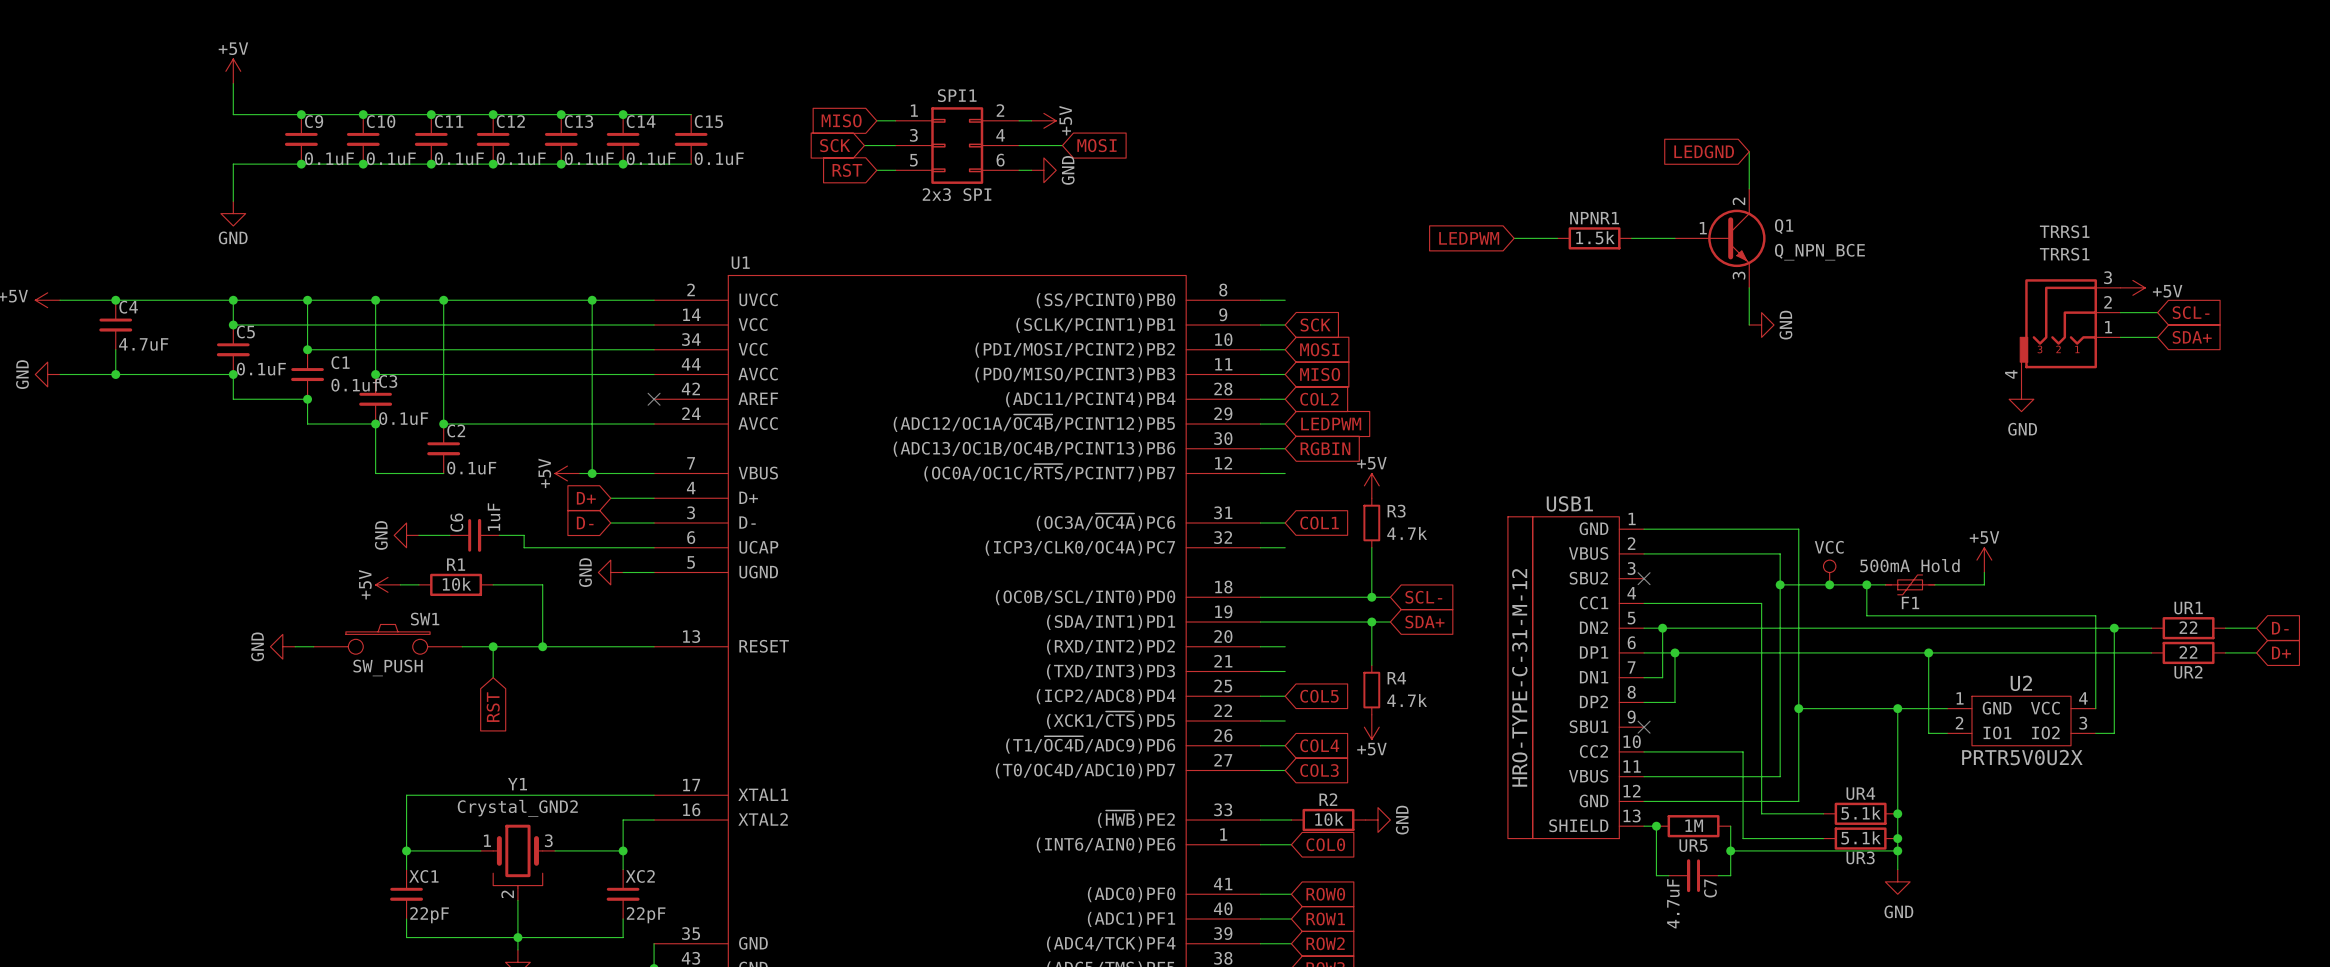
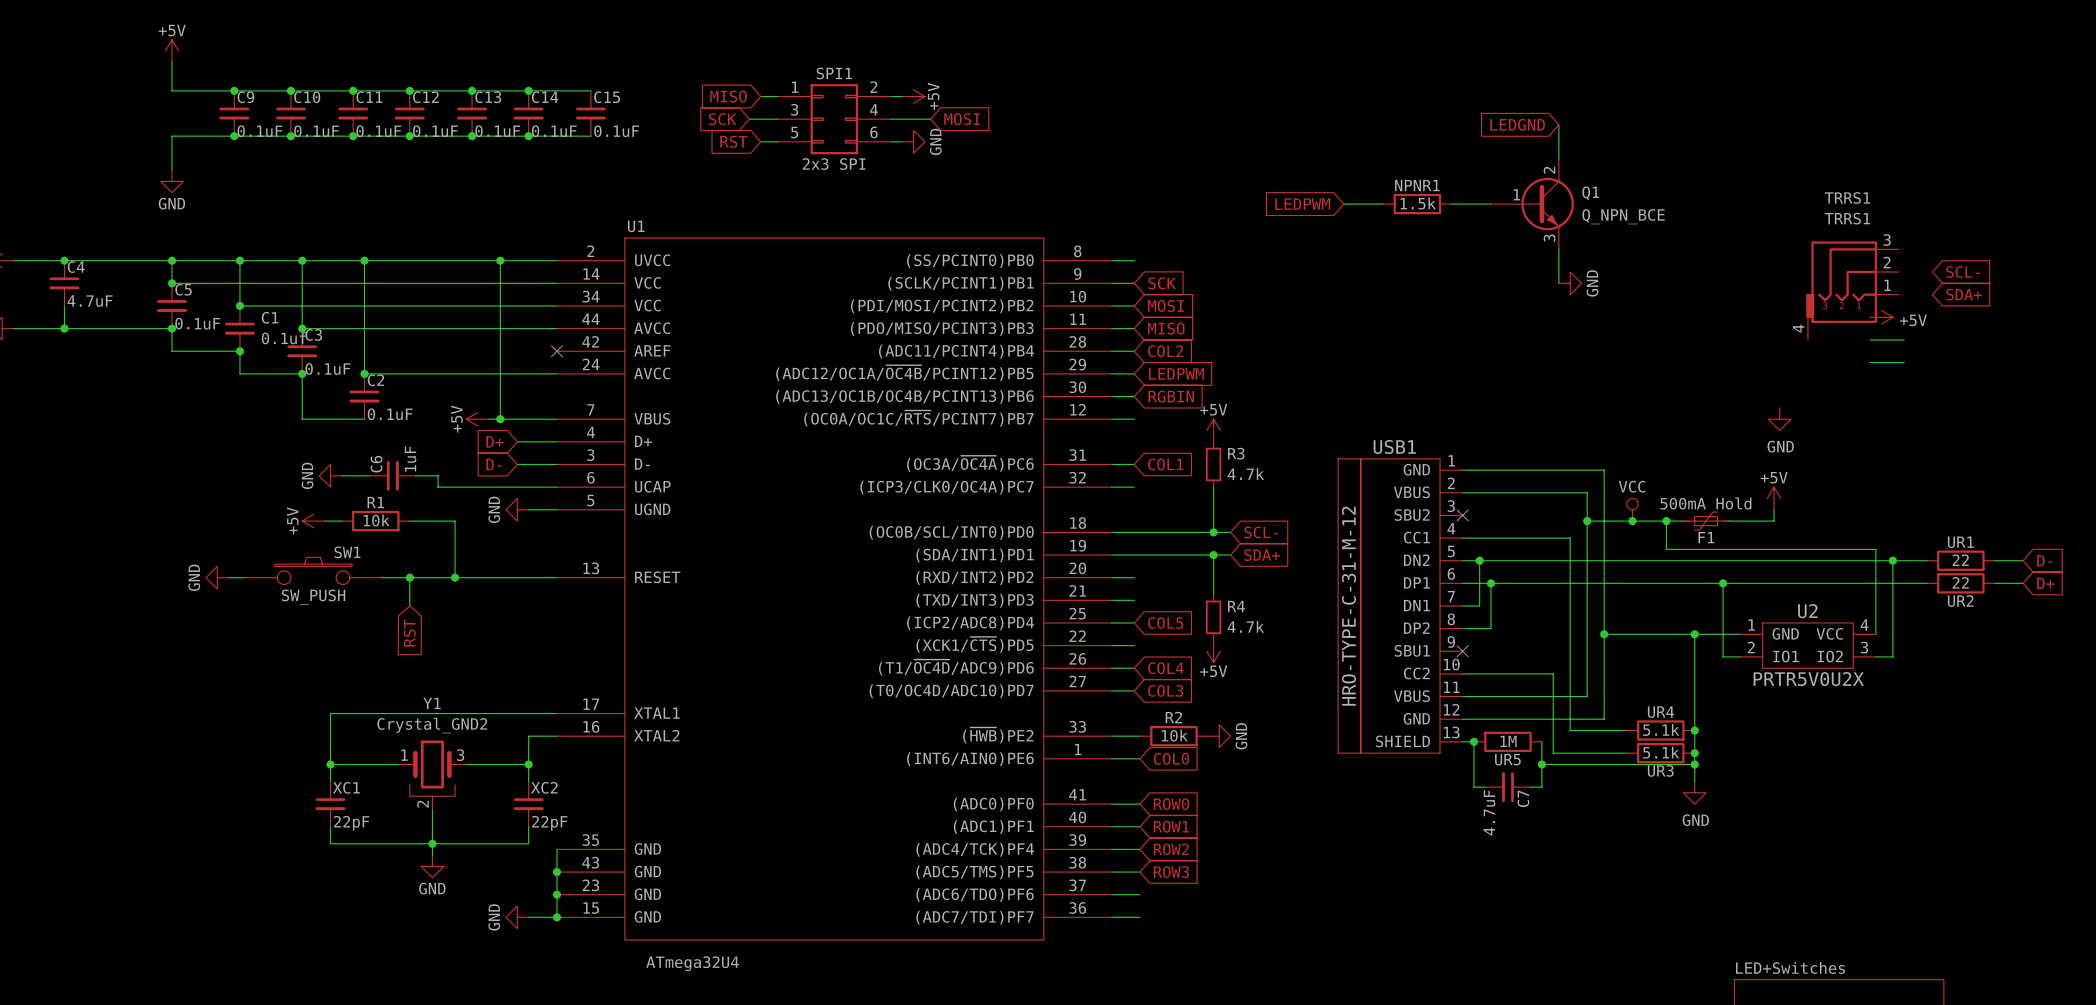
power symbol position: +5V (2132, 287) -> +5V (1881, 317)
wire: (2120, 312) (2157, 312) -> (1870, 339) (1904, 339)
wire: (2120, 337) (2157, 337) -> (1870, 362) (1904, 362)
power symbol position: GND (2021, 399) -> GND (1779, 419)

